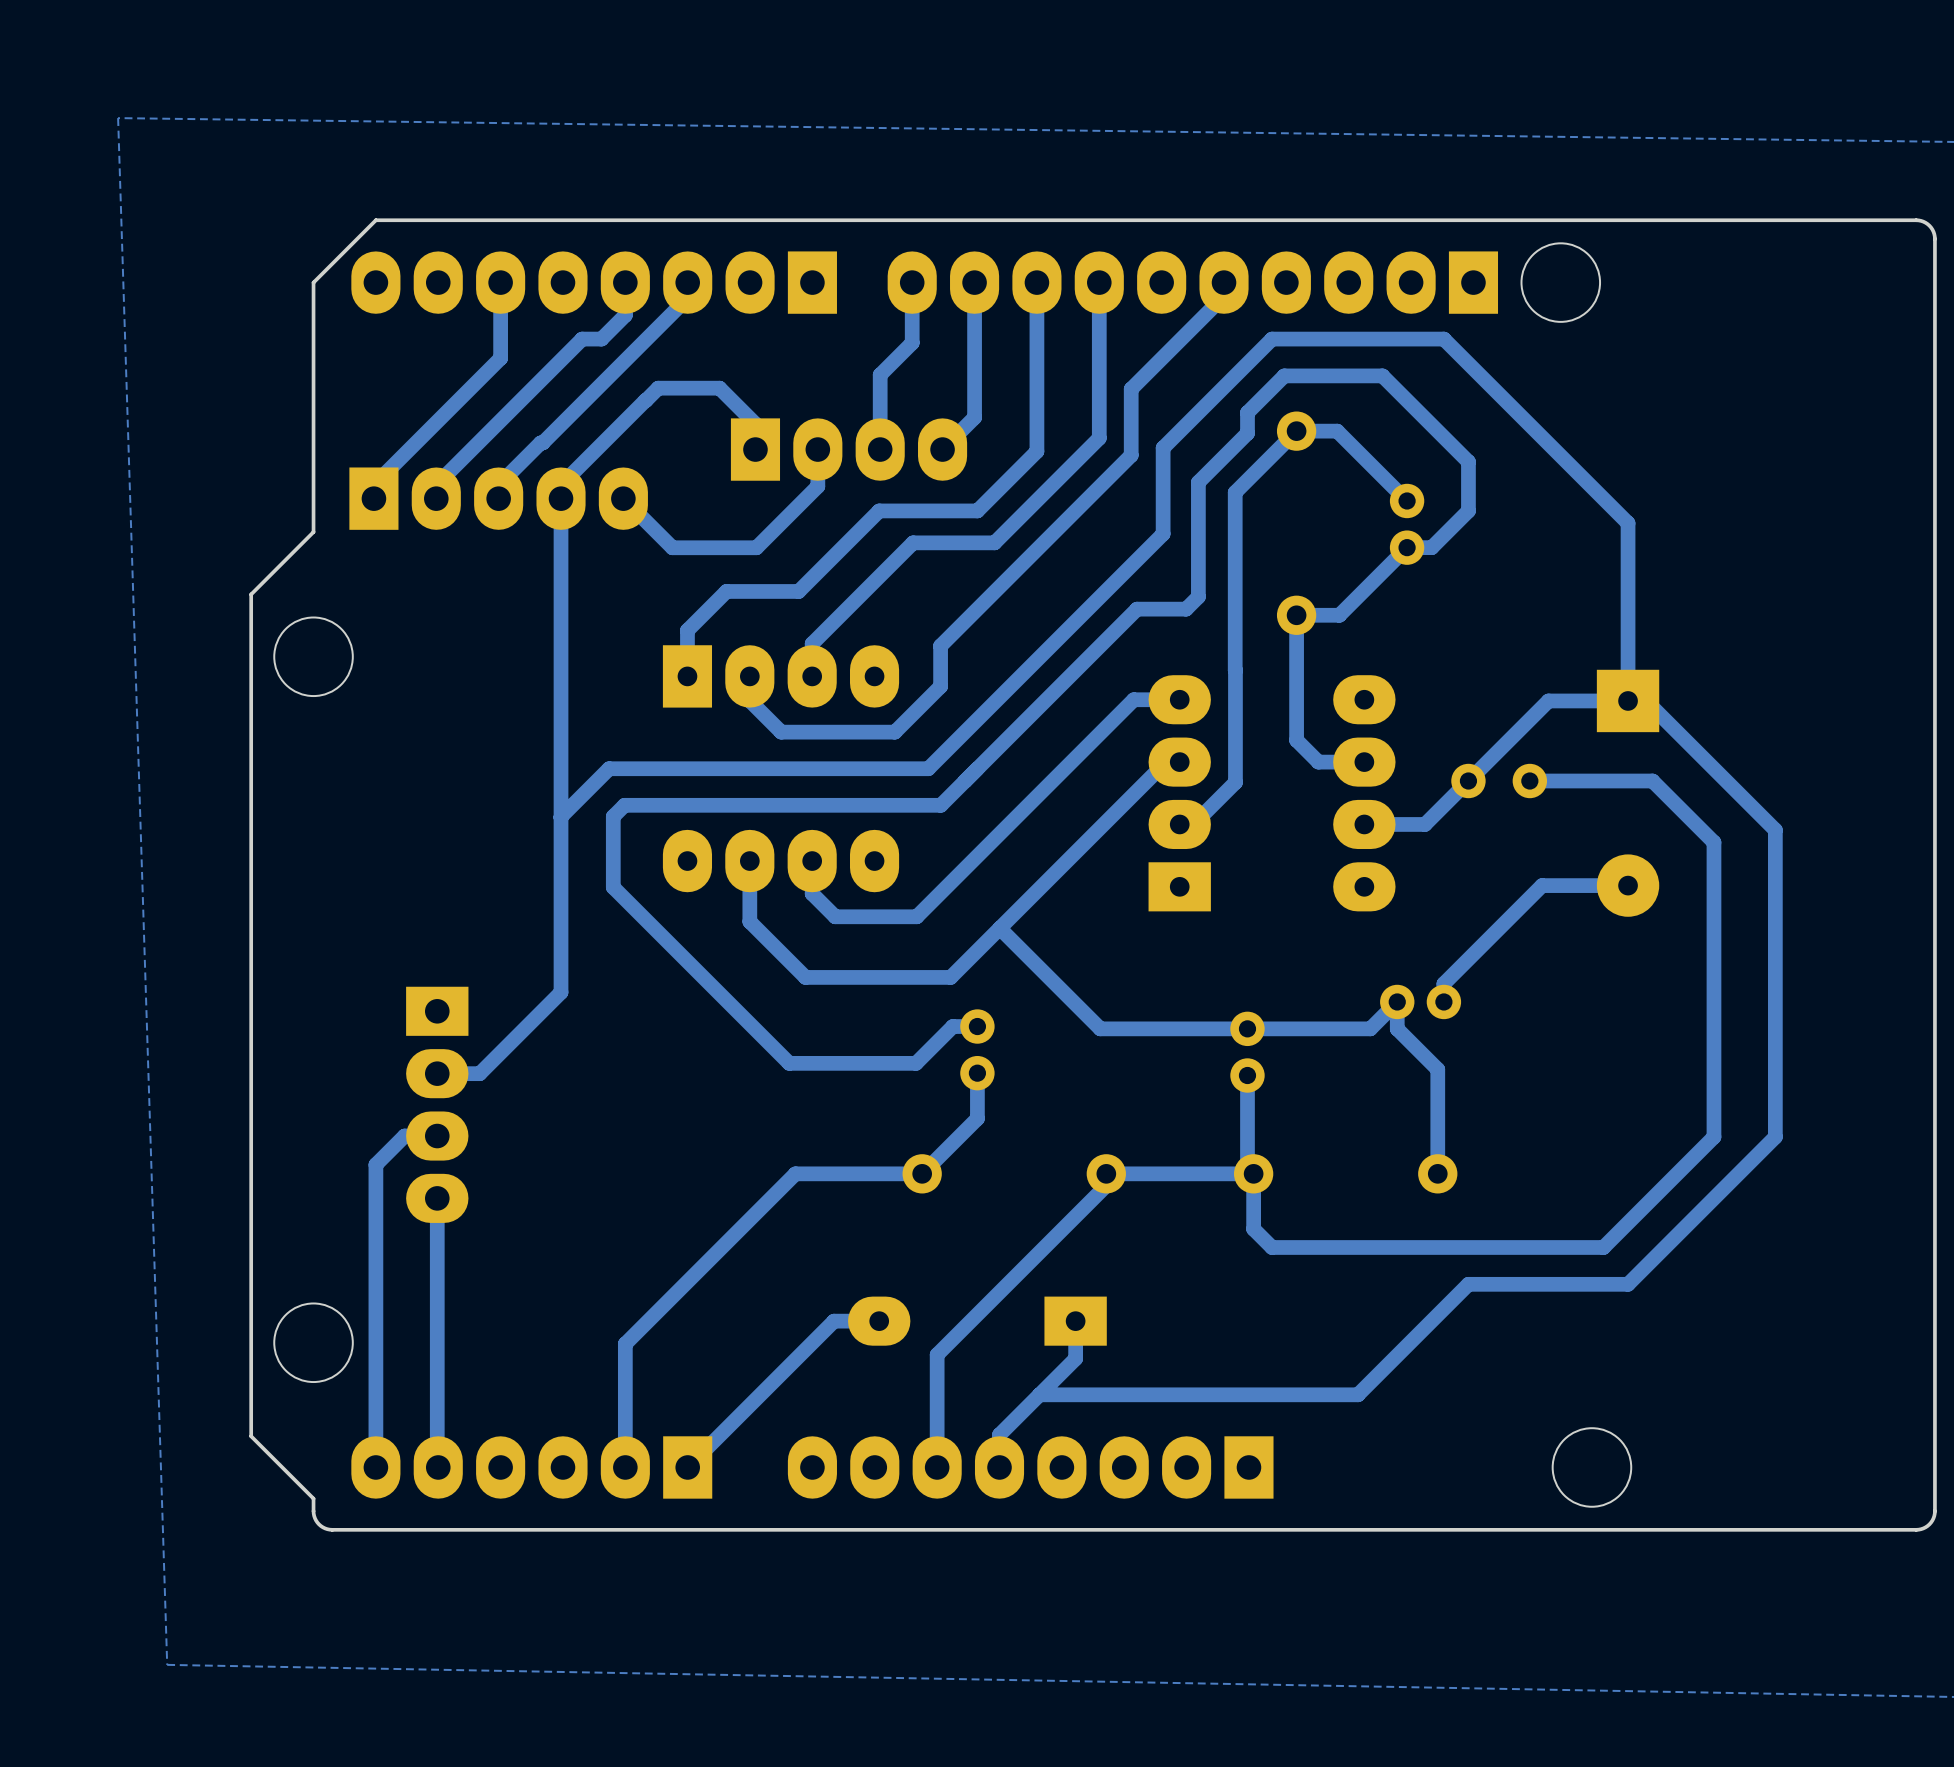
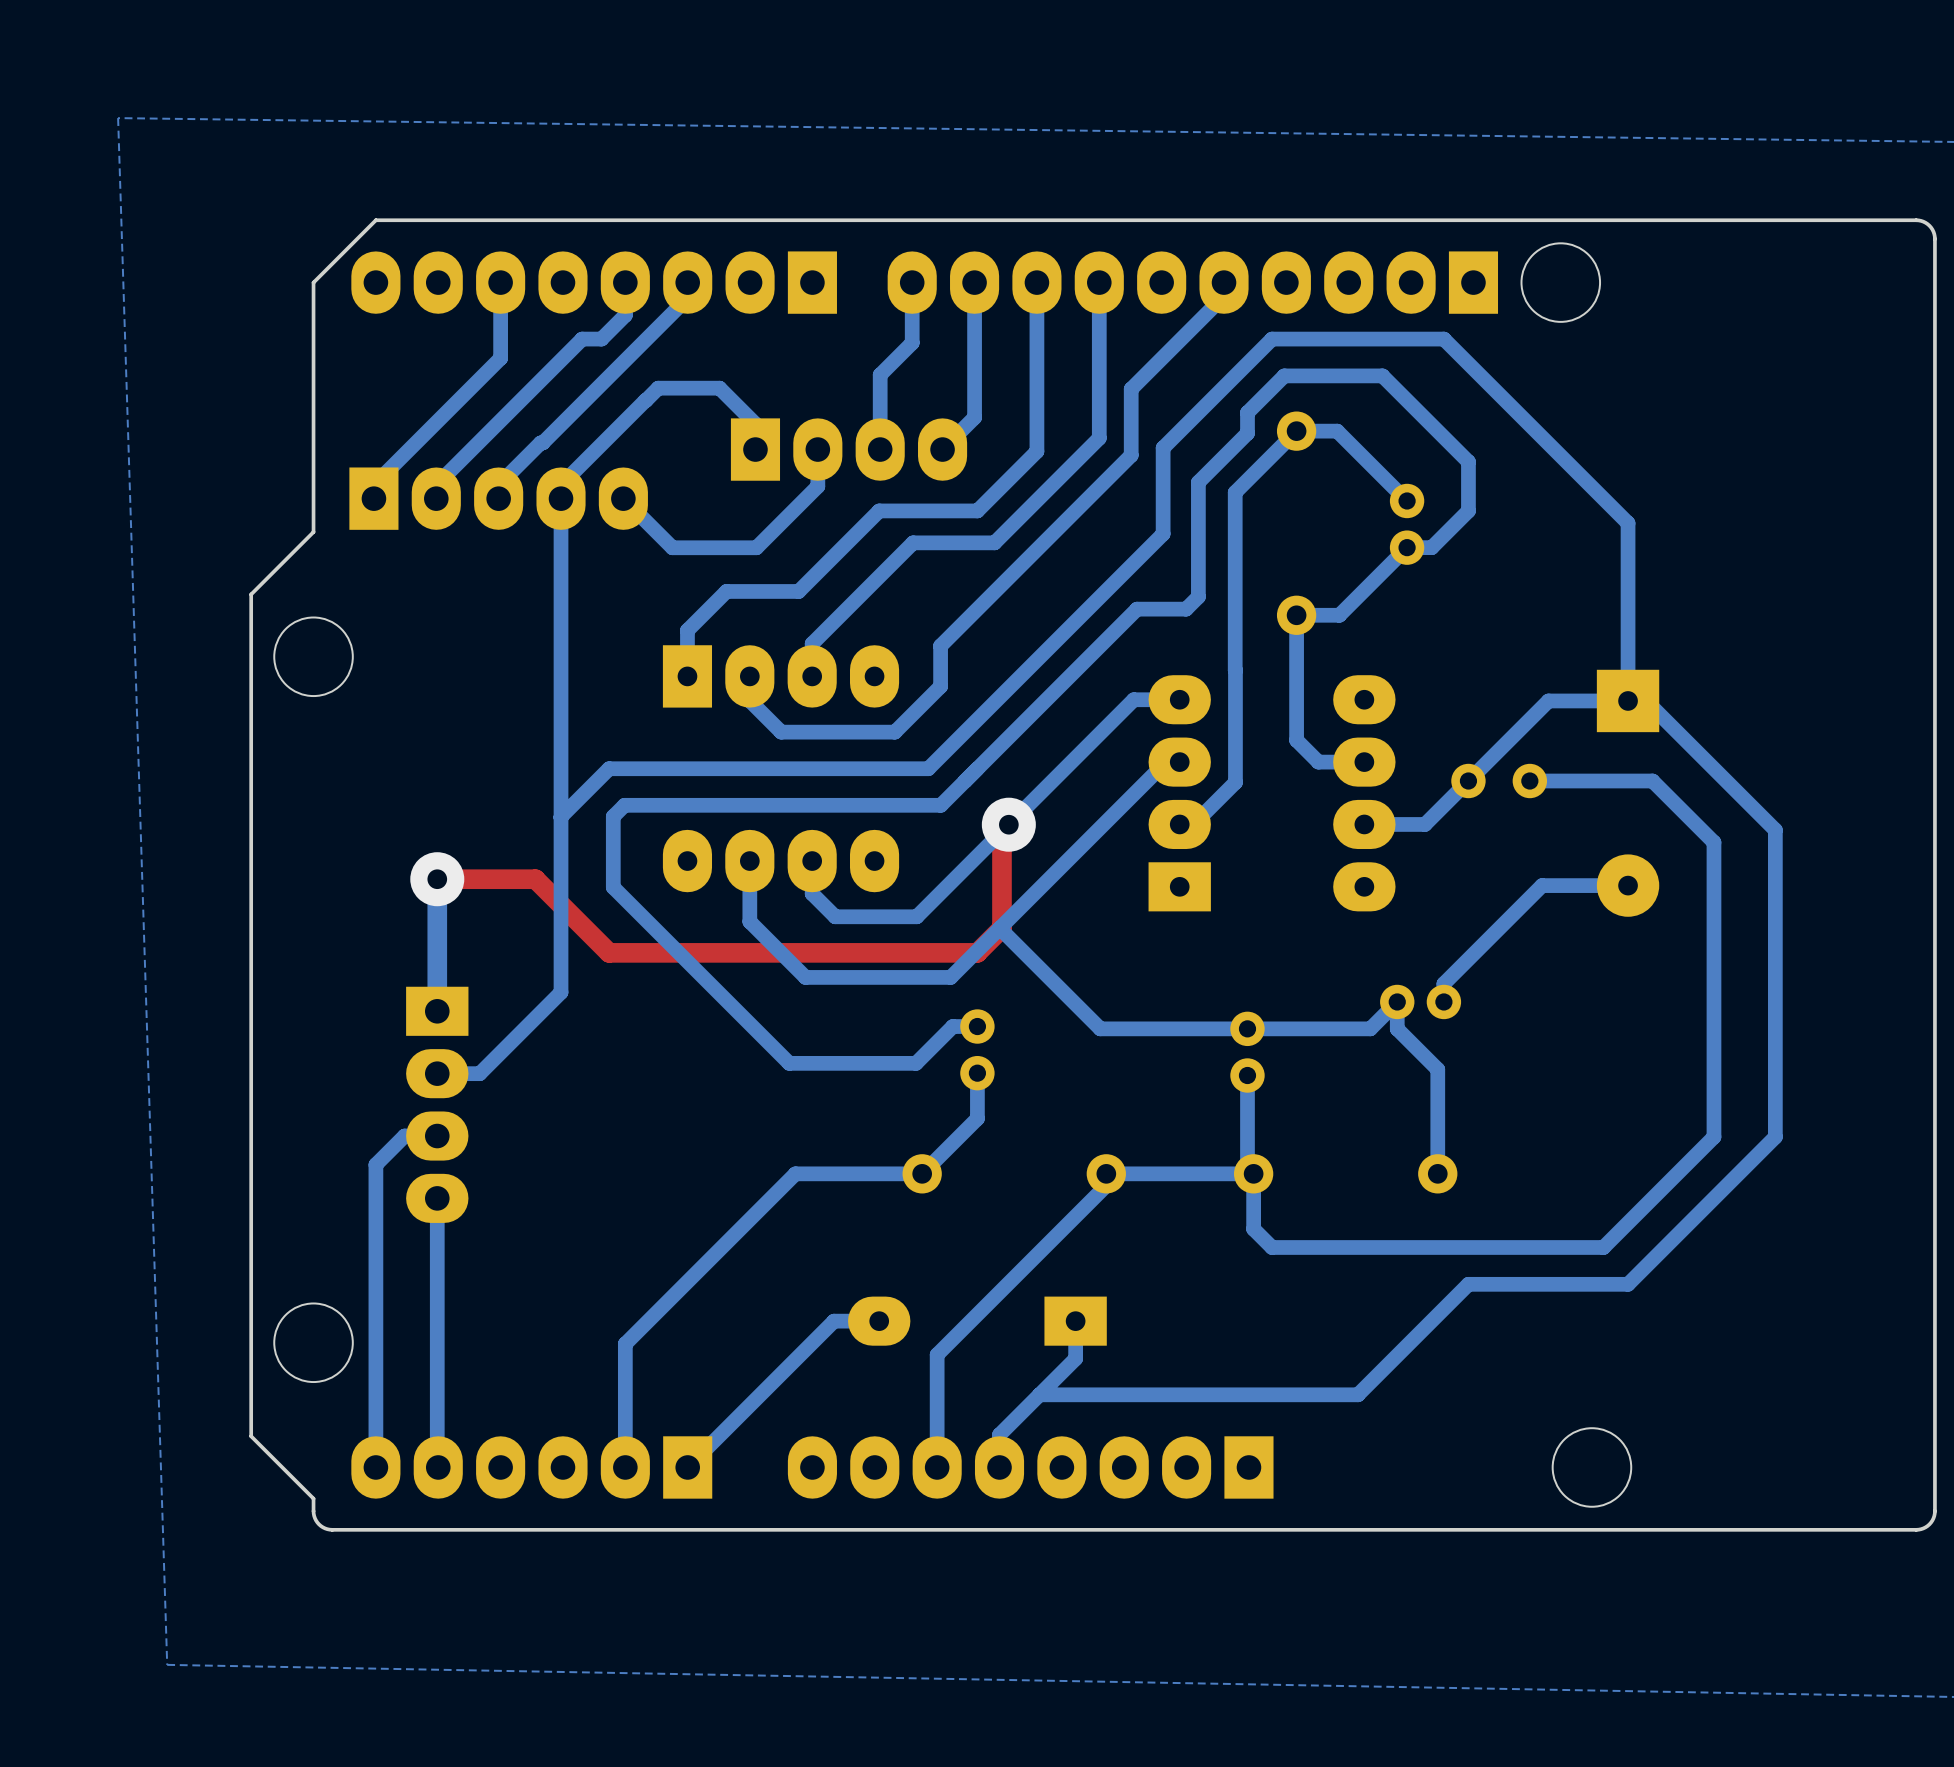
top track: none -> (1008, 824) (1001, 831) (1001, 928) (977, 952) (609, 952) (535, 879) (437, 879)
via: none -> (1008, 824)
bottom track: none -> (437, 879) (437, 1011)
via: none -> (437, 879)

